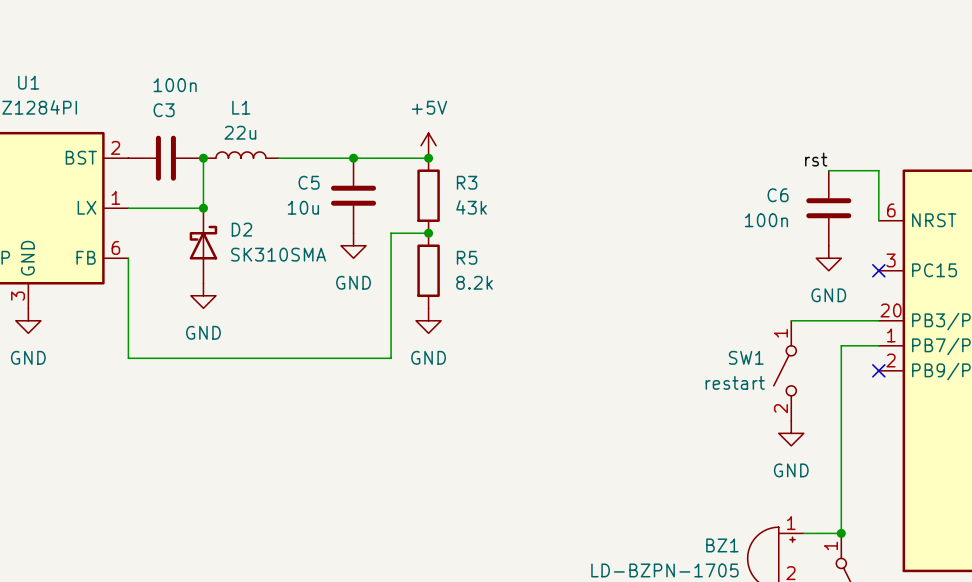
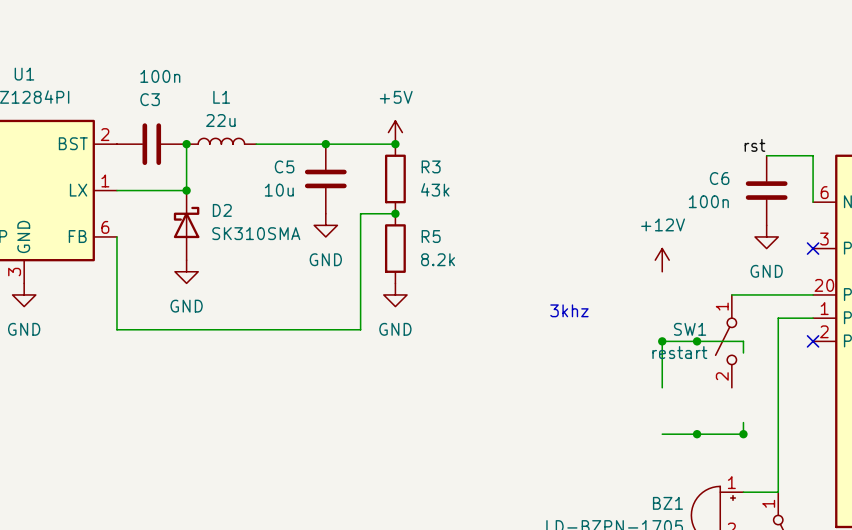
power symbol: none -> +12V (662, 260)
text: none -> 3khz (569, 310)
junction: none -> (662, 341)
junction: none -> (697, 341)
wire: none -> (743, 352) (743, 341) (662, 341) (662, 387)
power symbol: GND (791, 433) -> none
wire: none -> (743, 422) (743, 434) (662, 434)
junction: none -> (697, 434)
junction: none -> (743, 434)
junction: (841, 533) -> none

